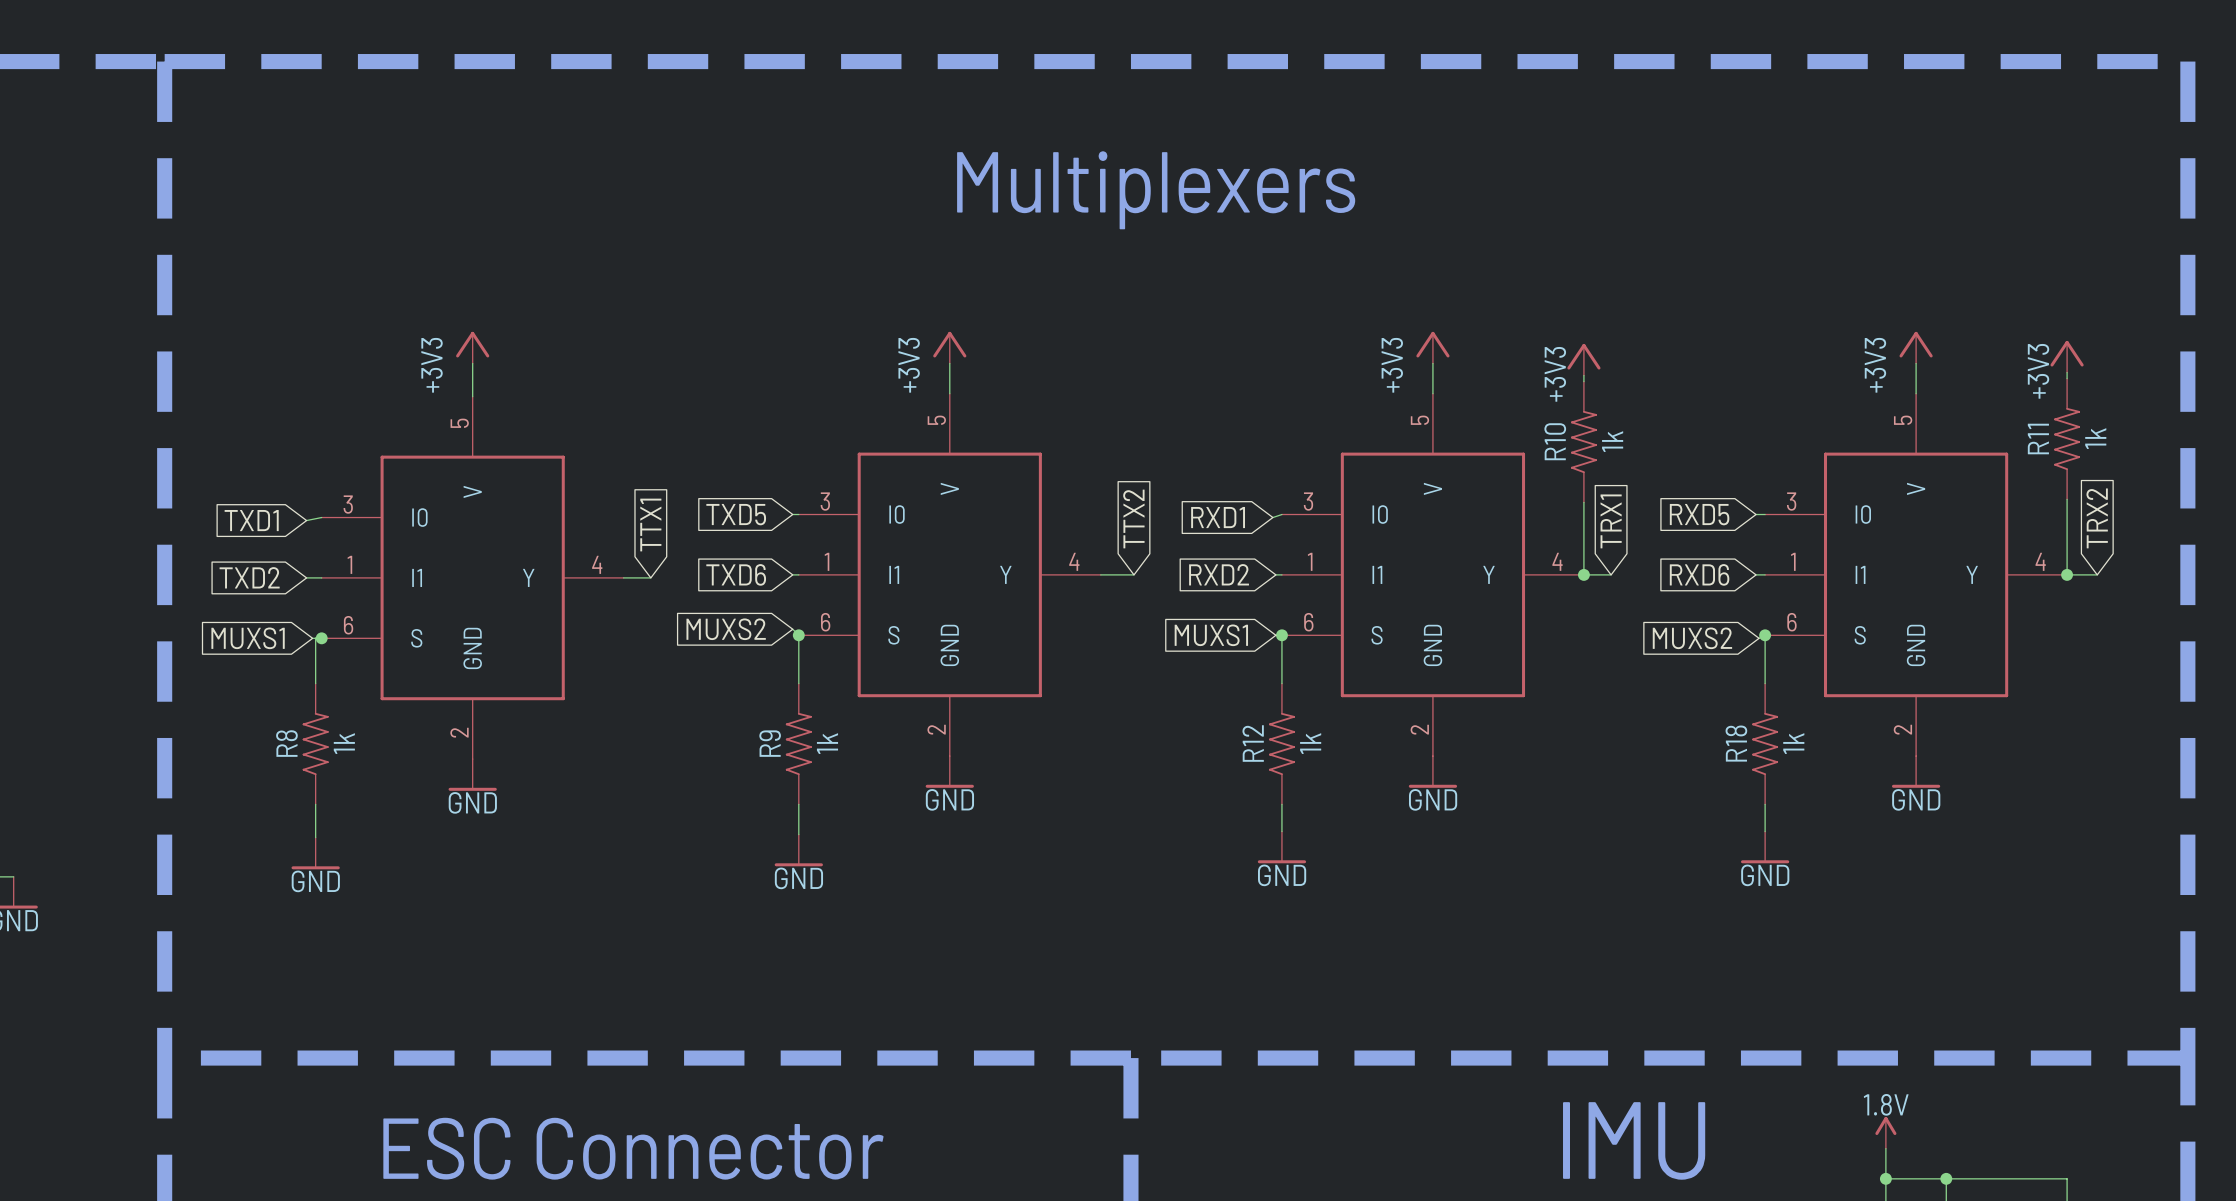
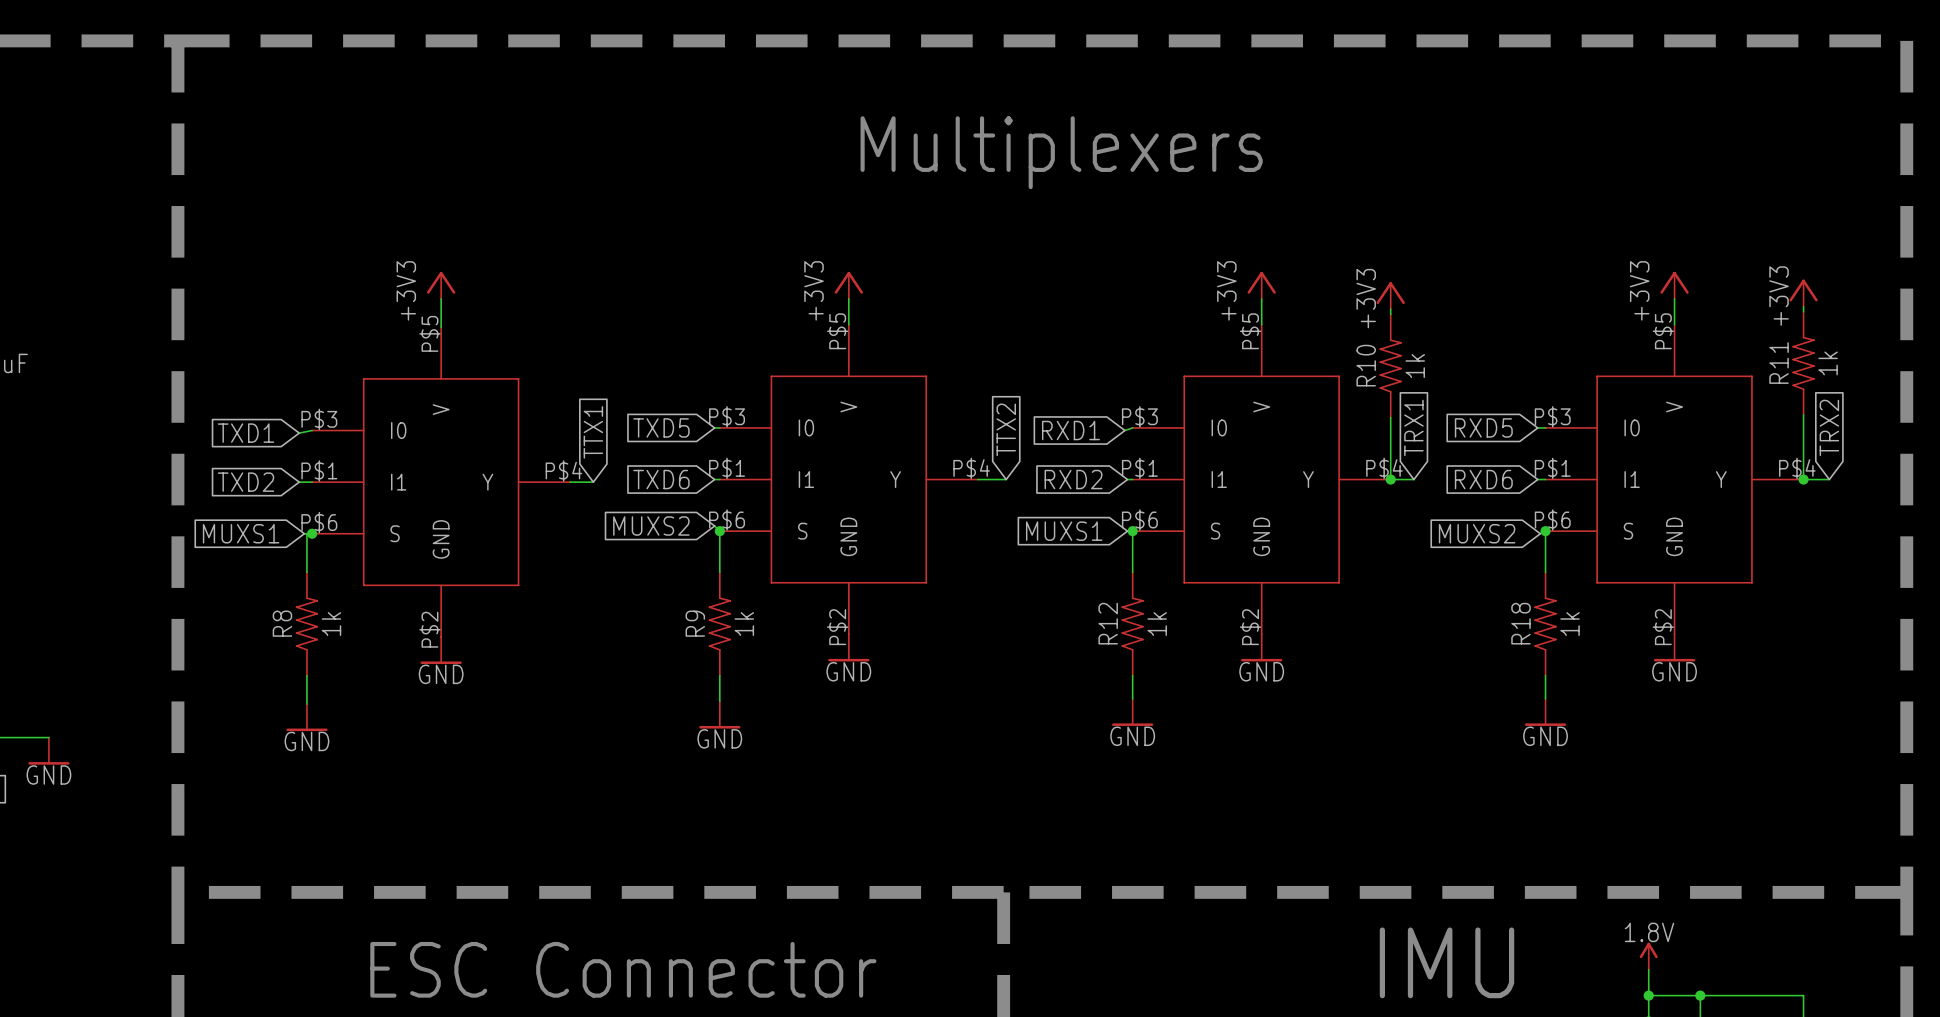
part symbol: [798, 393, 1101, 757] -> [719, 324, 978, 635]
part symbol: [1281, 393, 1584, 757] -> [1132, 324, 1391, 635]
part symbol: [1765, 393, 2068, 757] -> [1545, 324, 1804, 635]
part symbol: [321, 396, 624, 760] -> [312, 327, 571, 637]

